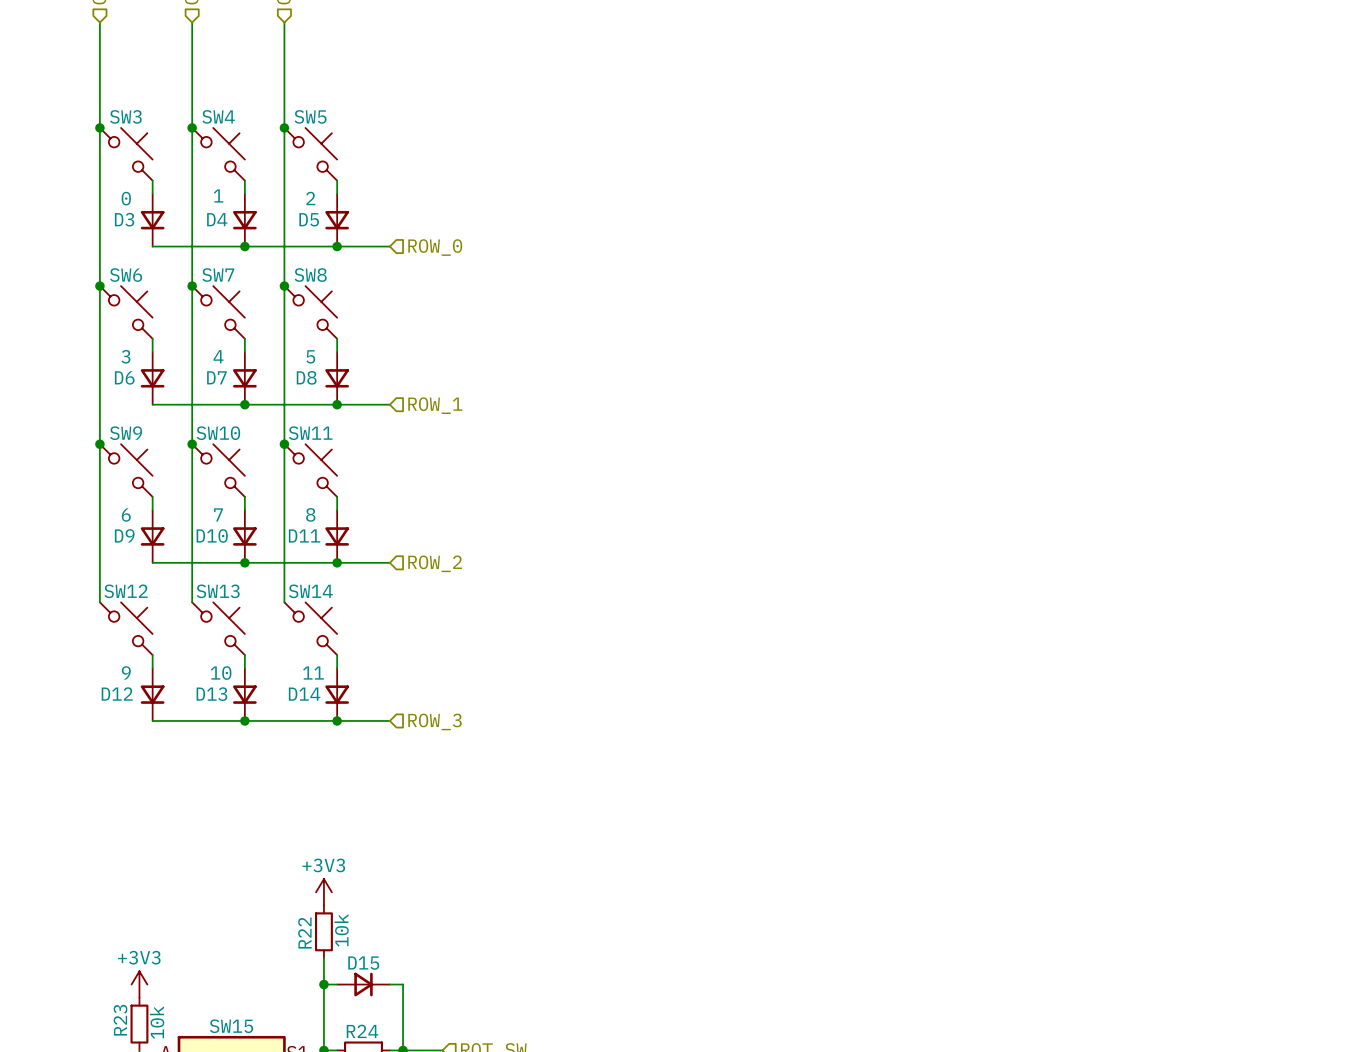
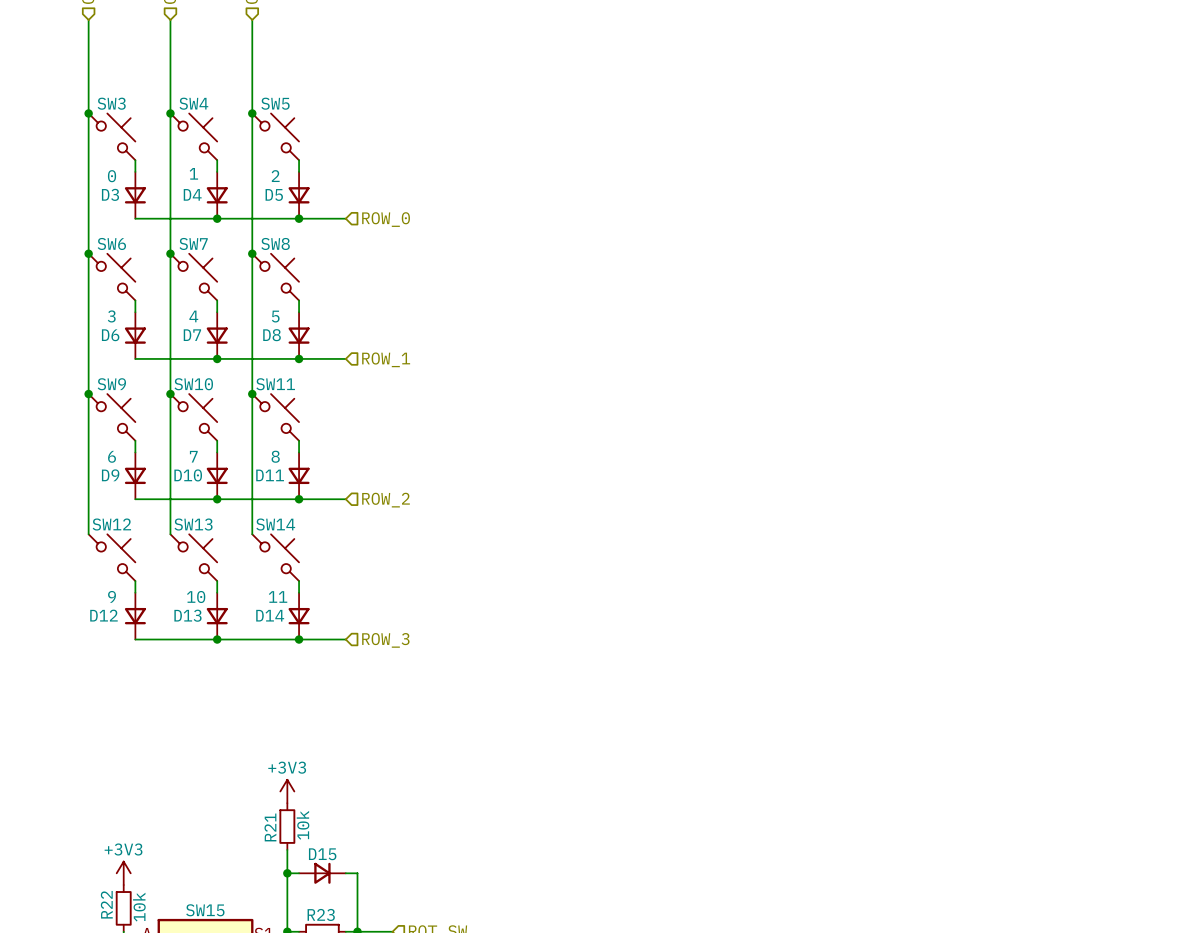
R22 name: R22 (304, 933) -> R21 (270, 827)
R23 name: R23 (120, 1020) -> R22 (106, 904)
R24 name: R24 (362, 1031) -> R23 (321, 914)

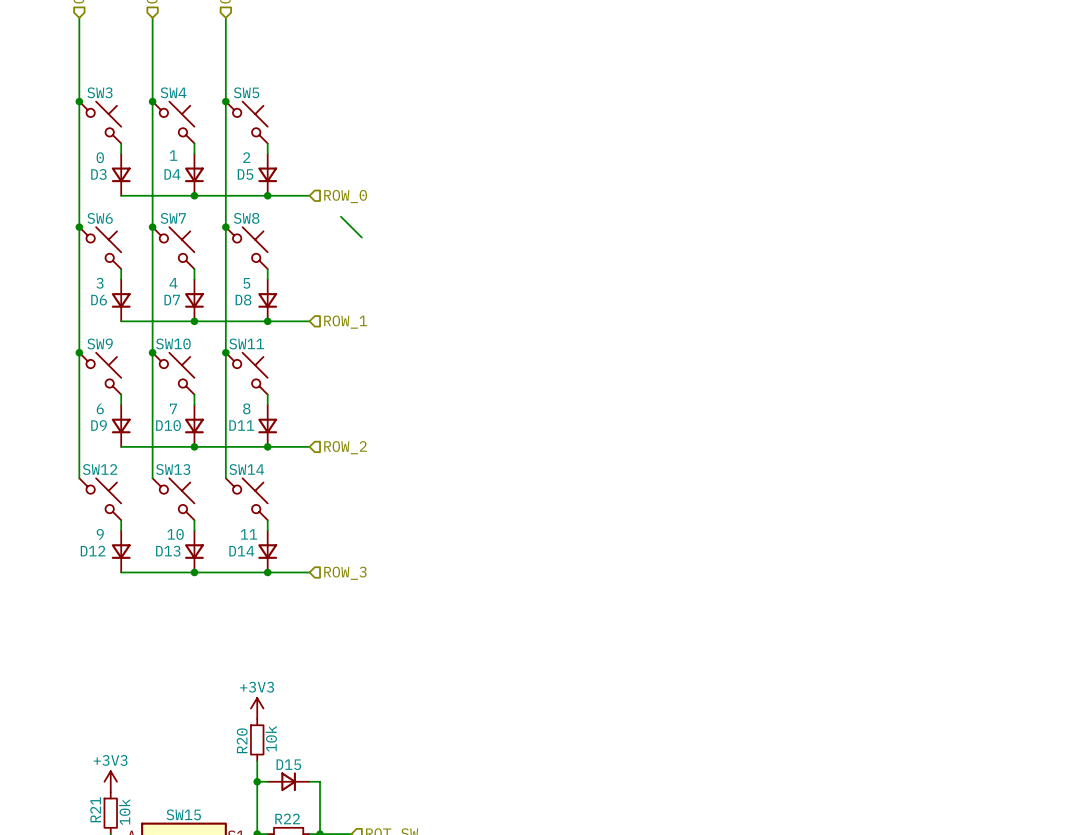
wire: none -> (340, 216) (361, 237)
R21 name: R21 (270, 827) -> R20 (242, 740)
R22 name: R22 (106, 904) -> R21 (95, 809)
R23 name: R23 (321, 914) -> R22 (287, 818)

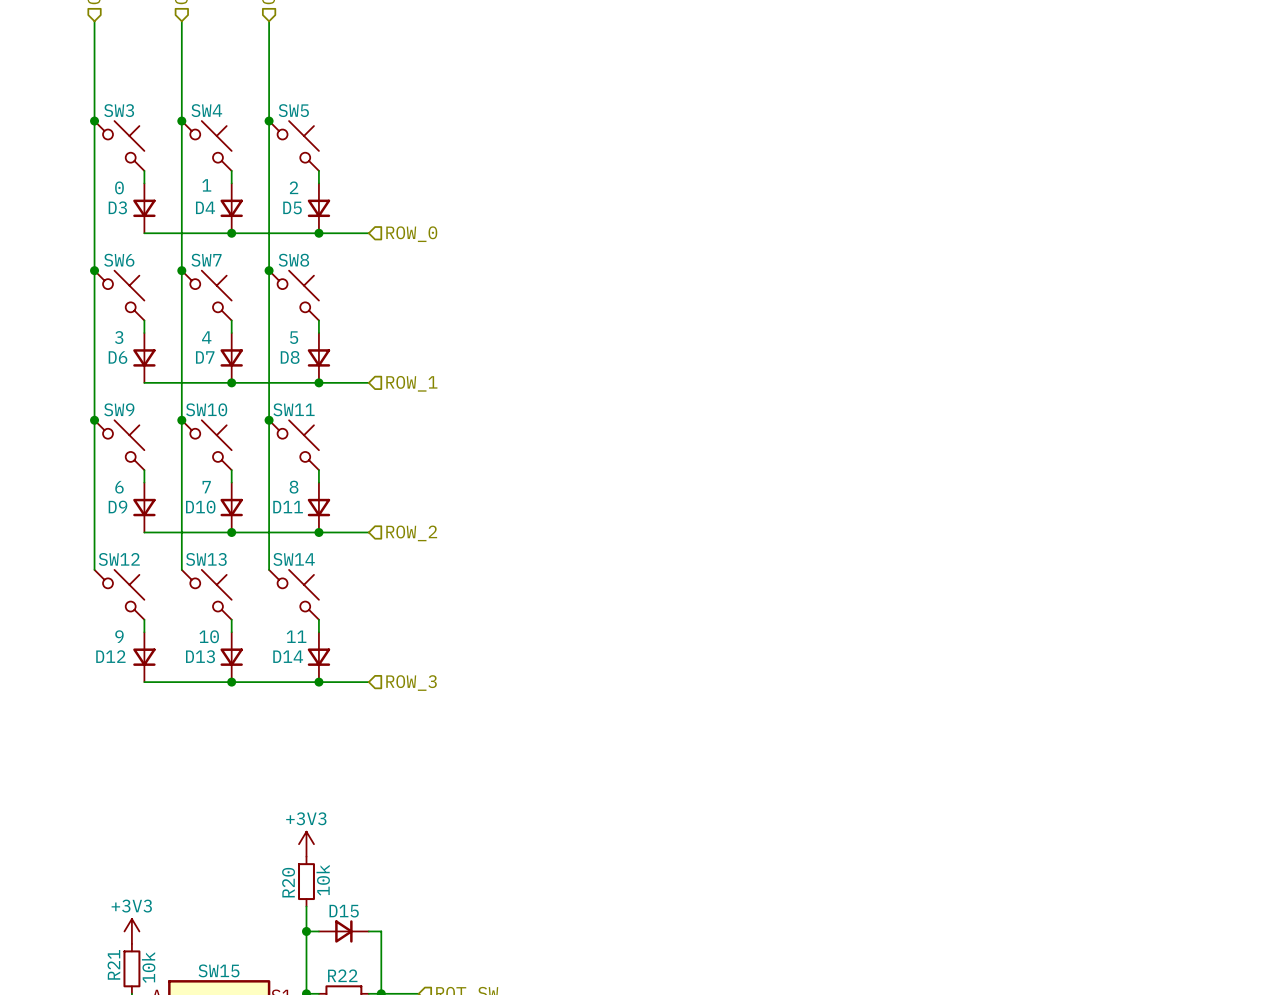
wire: (340, 216) (361, 237) -> none

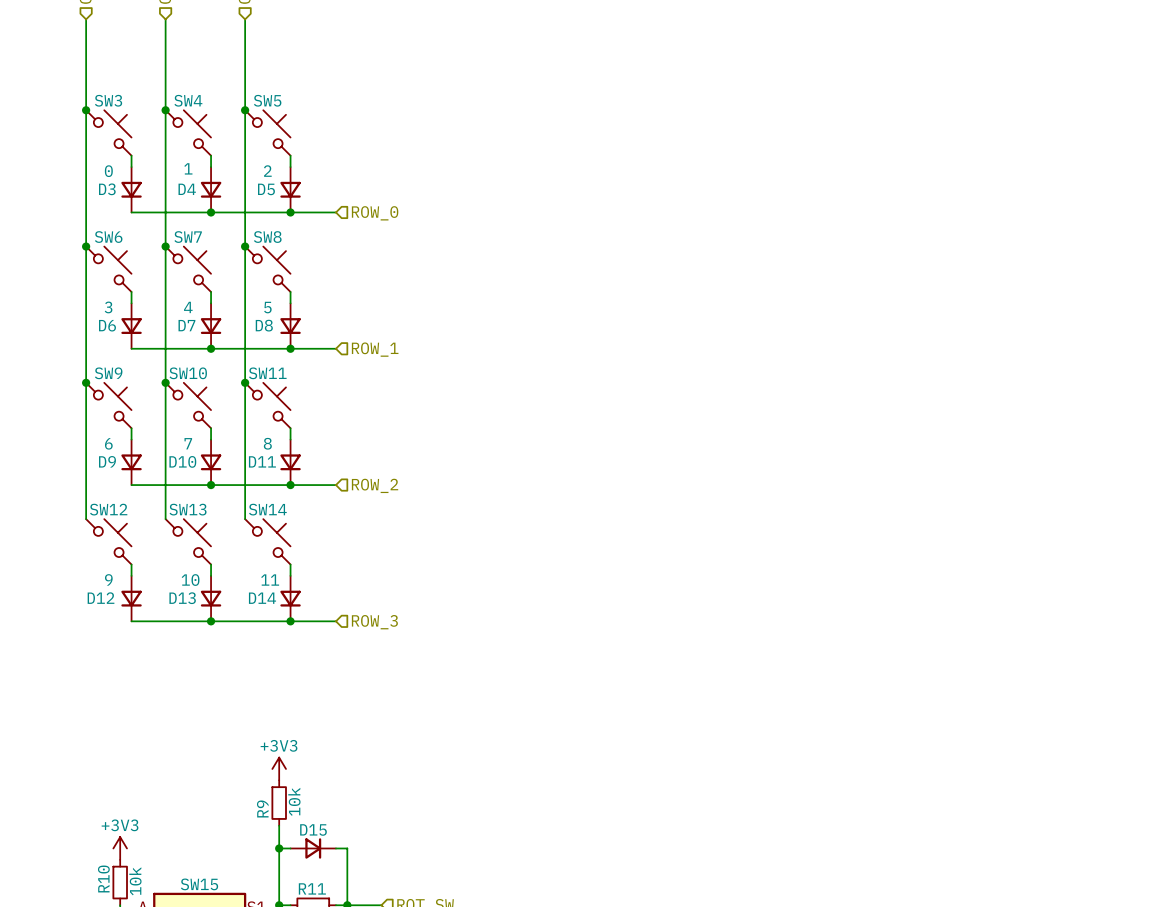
R20 name: R20 (288, 882) -> R9 (262, 808)
R21 name: R21 (113, 964) -> R10 (103, 878)
R22 name: R22 (342, 975) -> R11 (312, 888)

